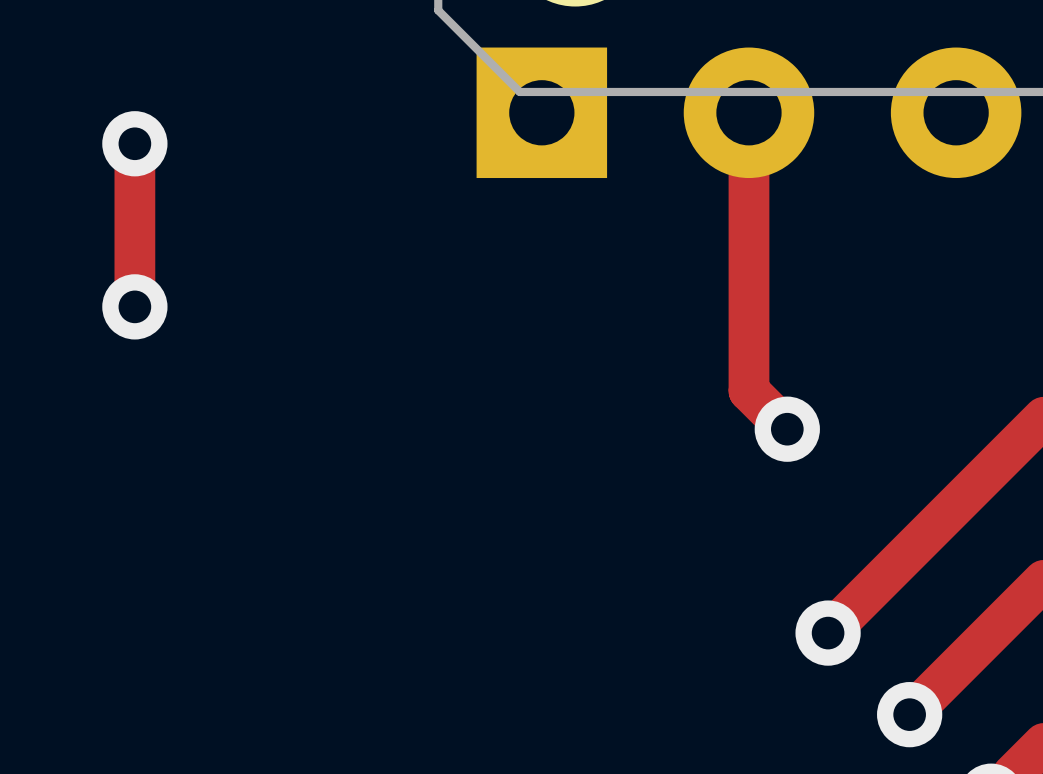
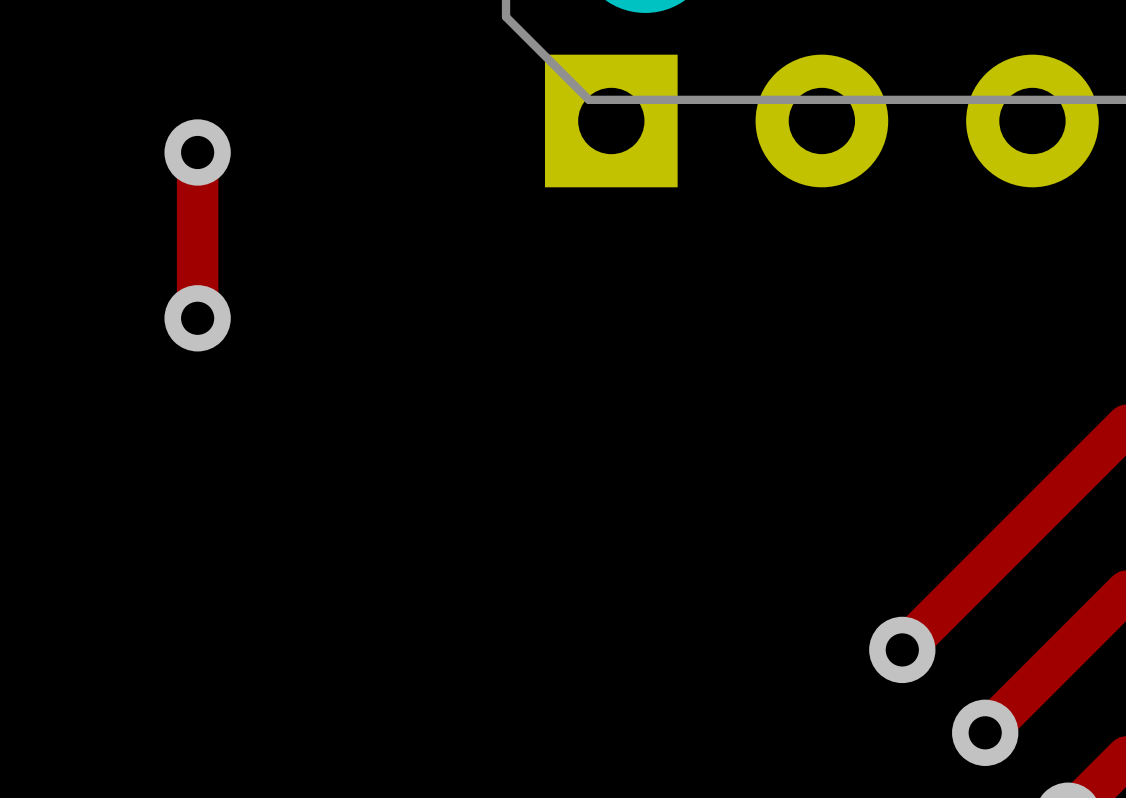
track: (748, 112) (748, 390) (787, 429) -> none
via: (787, 429) -> none

